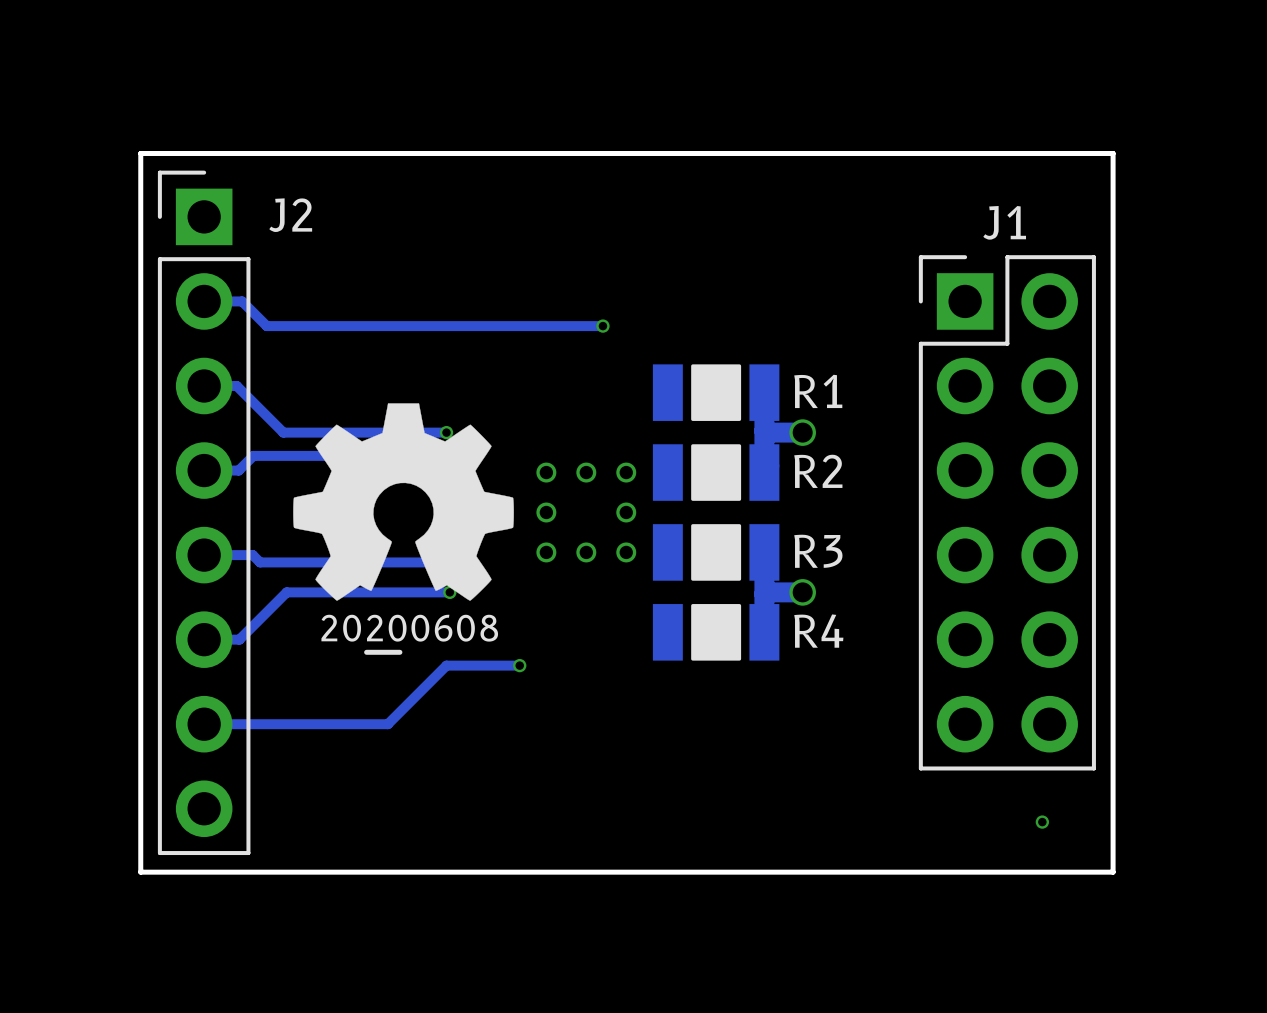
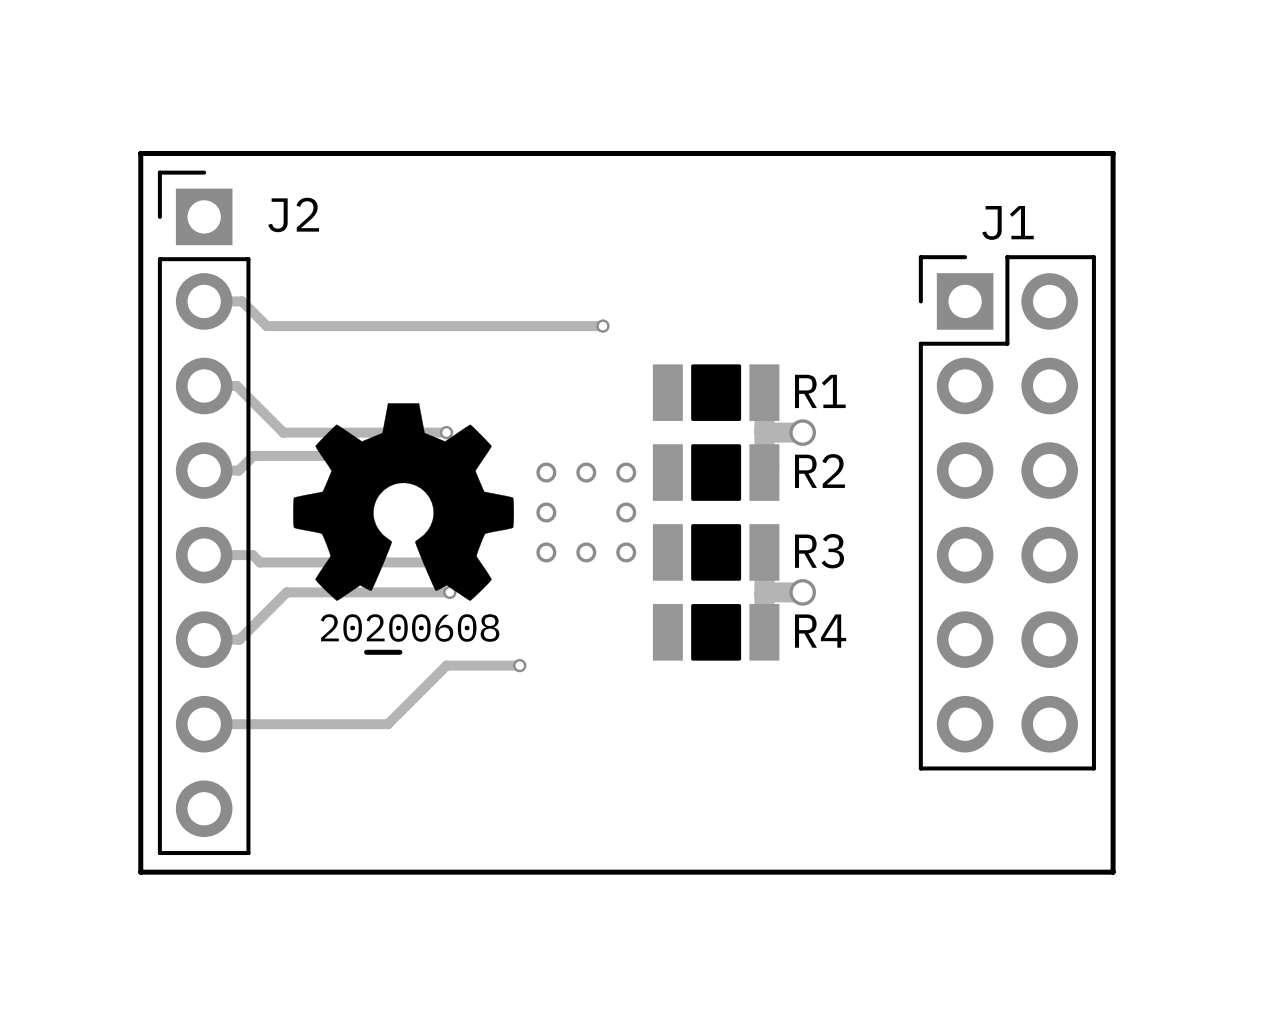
via: (1042, 822) -> none

